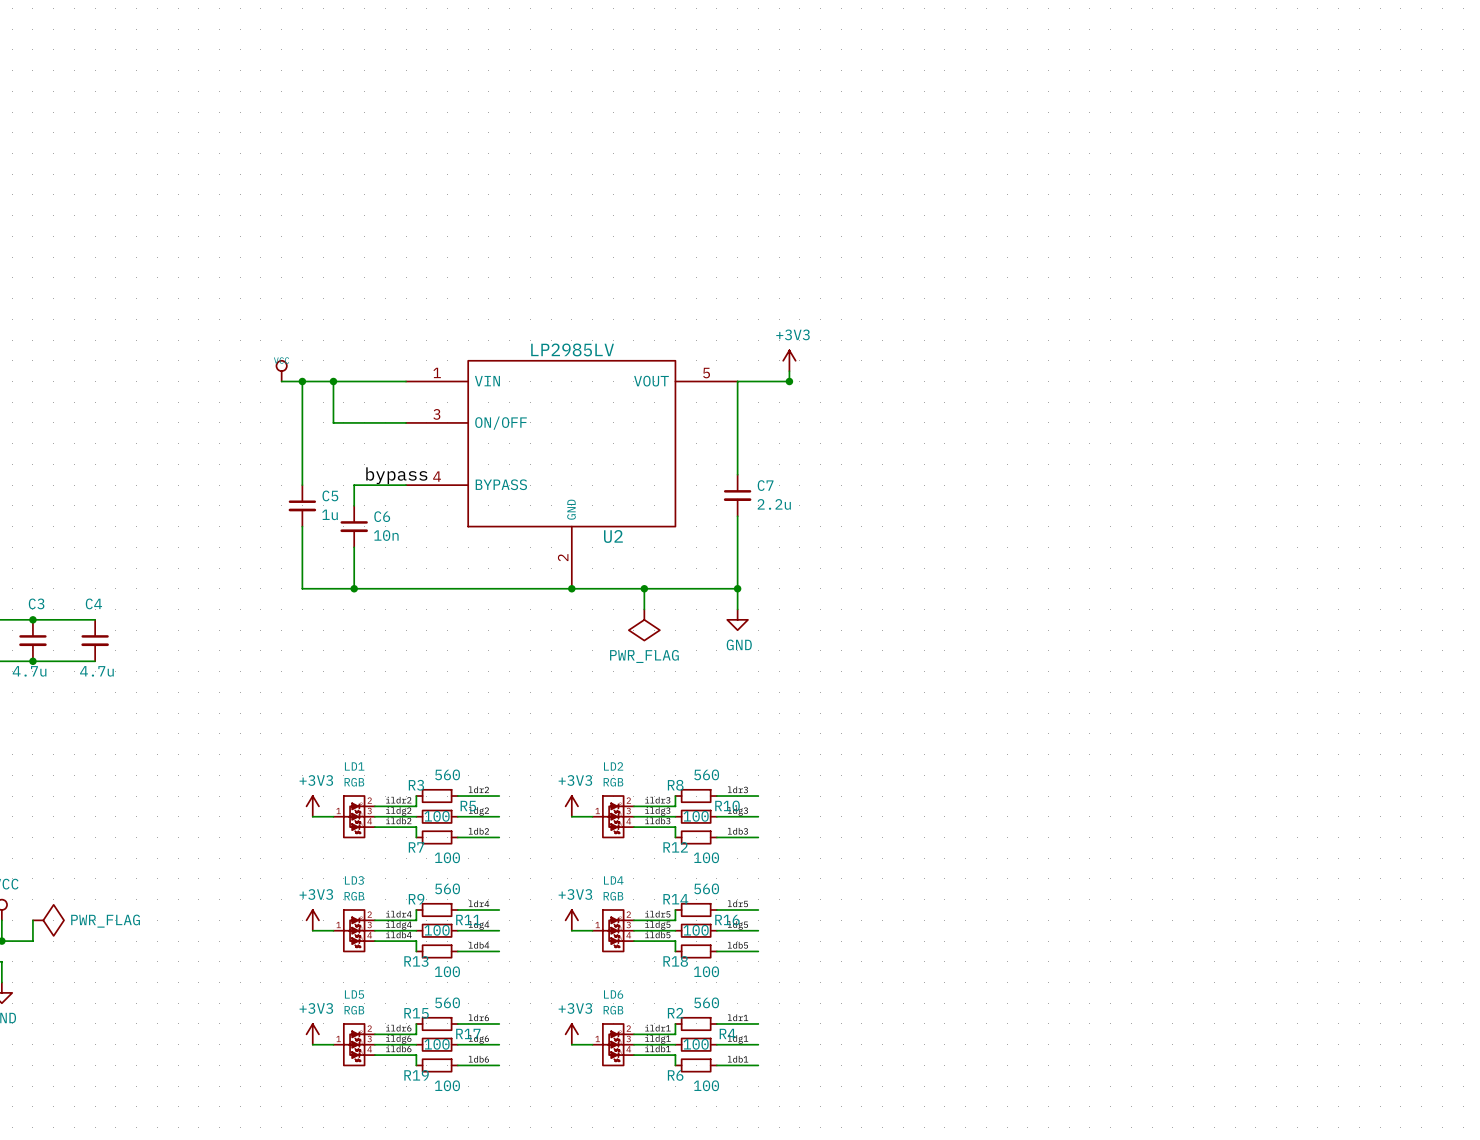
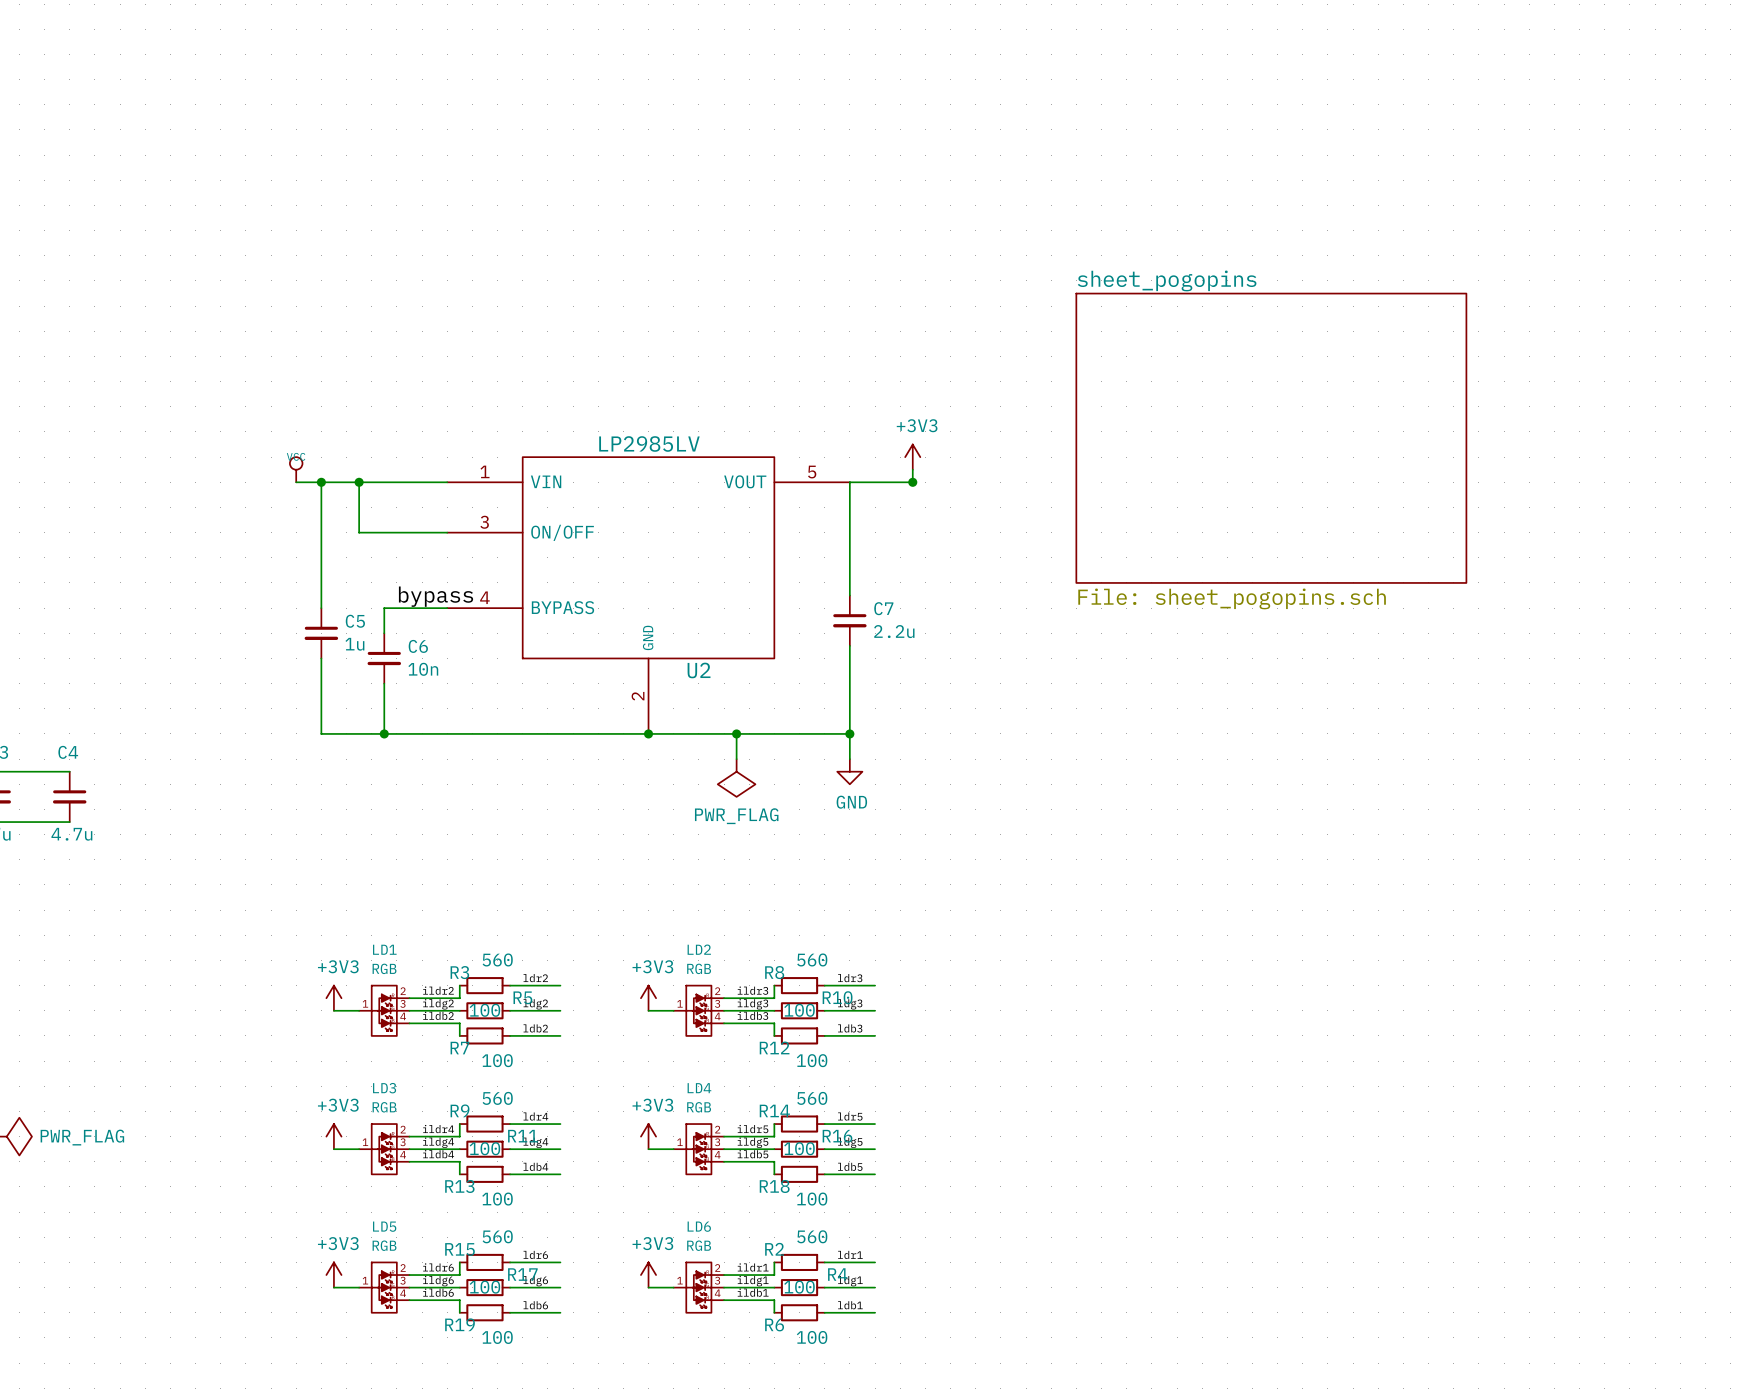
sheet sheet_pogopins: none -> File: sheet_pogopins.sch (1271, 438)

